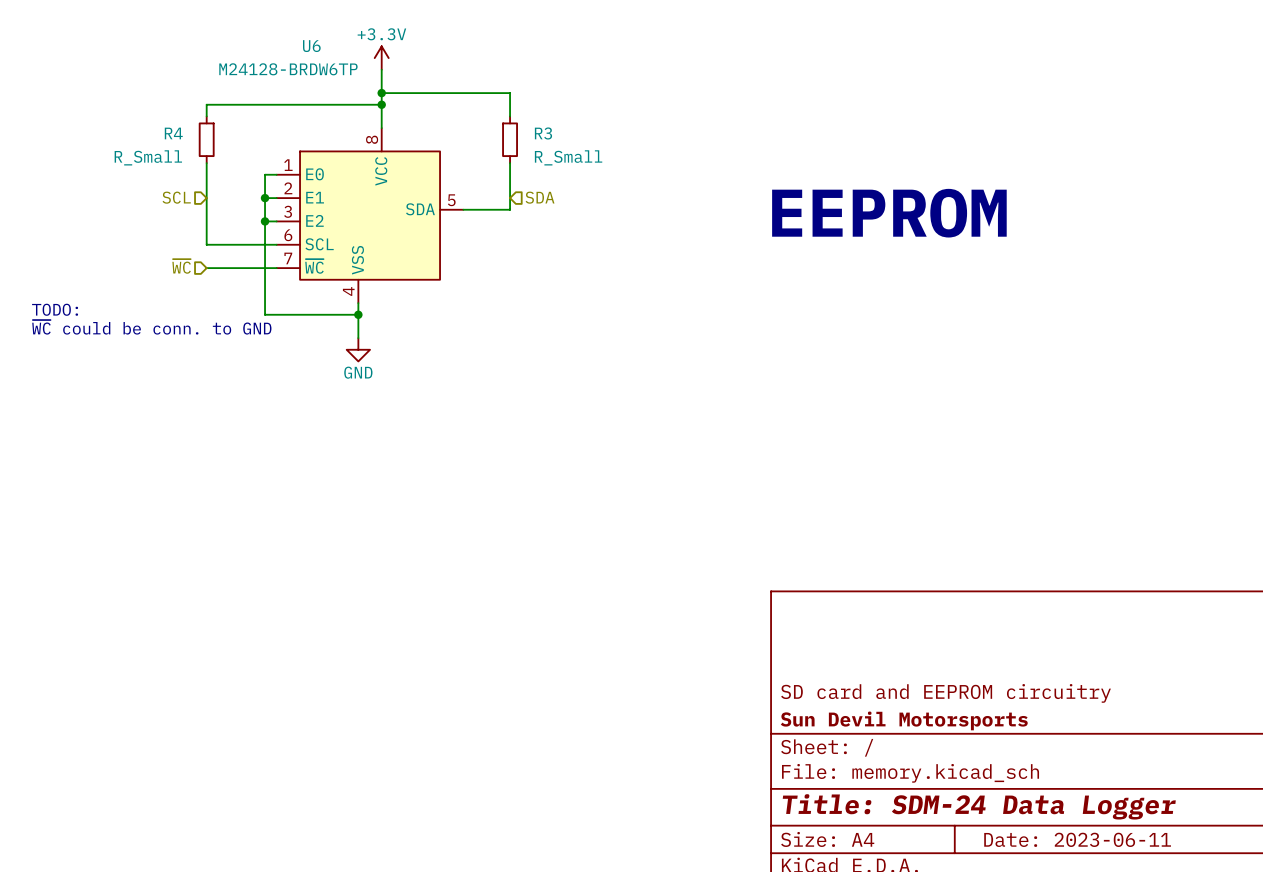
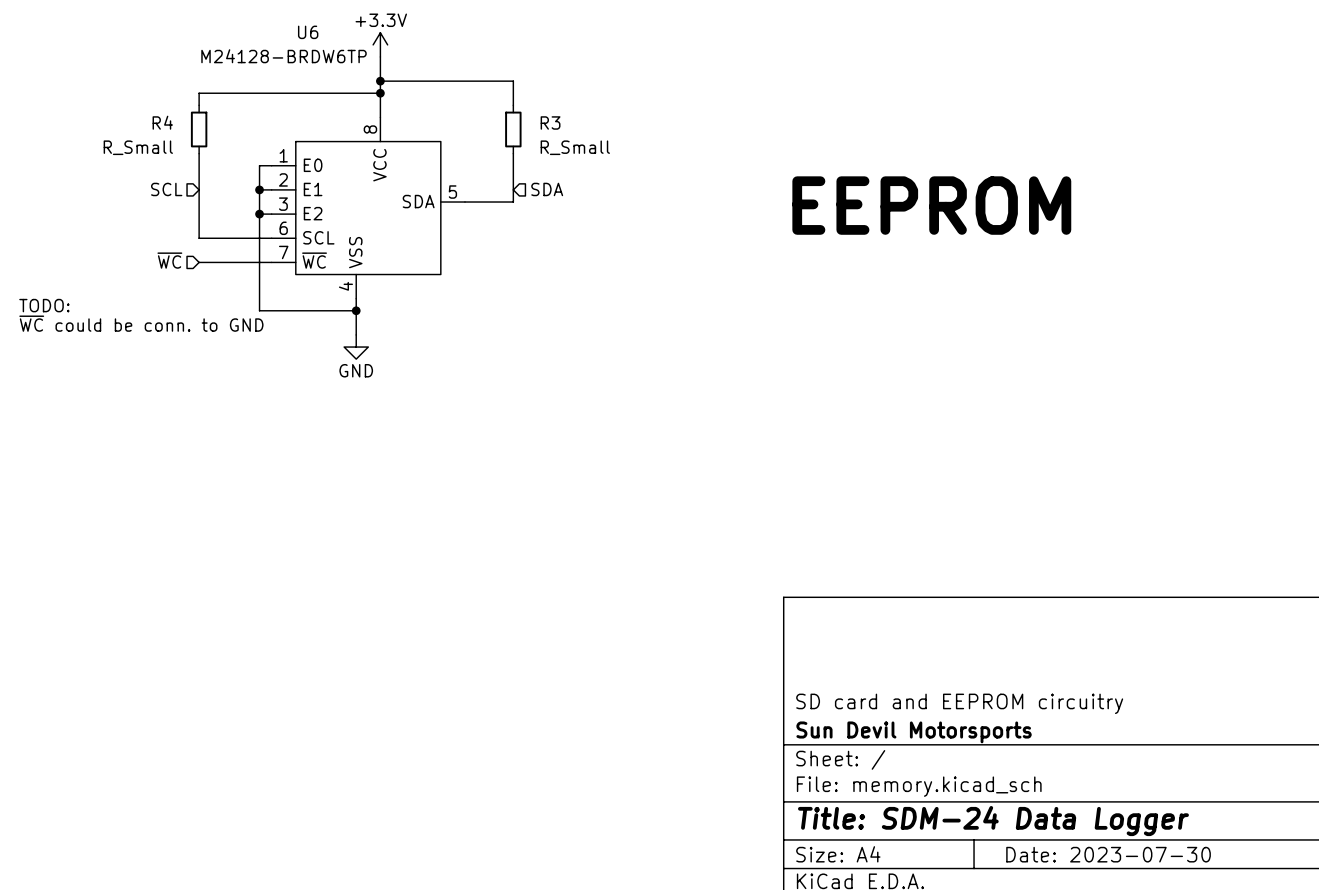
title block: Date: 2023-06-11 (1077, 839) -> Date: 2023-07-30 (1108, 854)

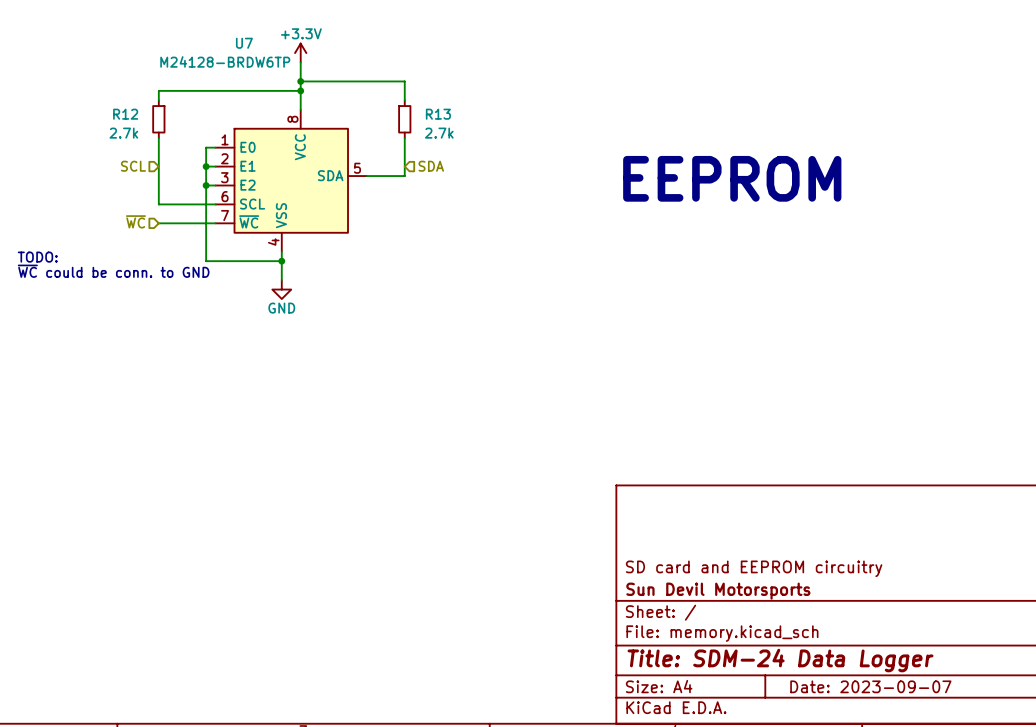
U6 name: U6 (308, 32) -> U7 (244, 43)
R4 name: R4 (162, 122) -> R12 (125, 114)
R3 name: R3 (550, 122) -> R13 (438, 114)
R4 value: R_Small (138, 147) -> 2.7k (123, 133)
R3 value: R_Small (575, 147) -> 2.7k (439, 133)
title block: Date: 2023-07-30 (1108, 854) -> Date: 2023-09-07 (870, 686)

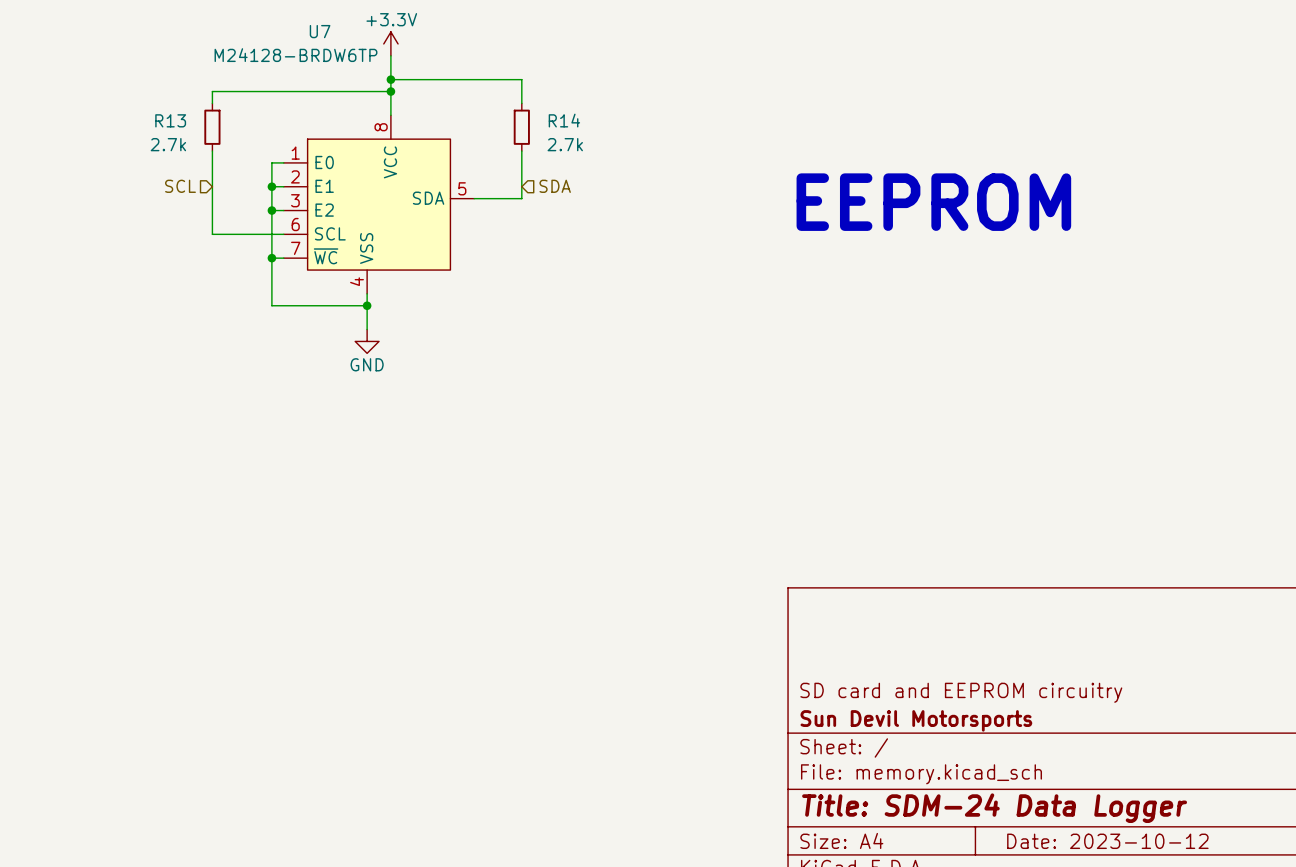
R12 name: R12 (125, 114) -> R13 (170, 120)
R13 name: R13 (438, 114) -> R14 (564, 120)
hierarchical label: ~{WC} (135, 221) -> none
wire: (158, 223) (206, 223) -> none
junction: none -> (271, 258)
text: TODO: (37, 257) -> none
text: ~{WC} could be conn. to GND (113, 271) -> none
title block: Date: 2023-09-07 (870, 686) -> Date: 2023-10-12 (1107, 841)

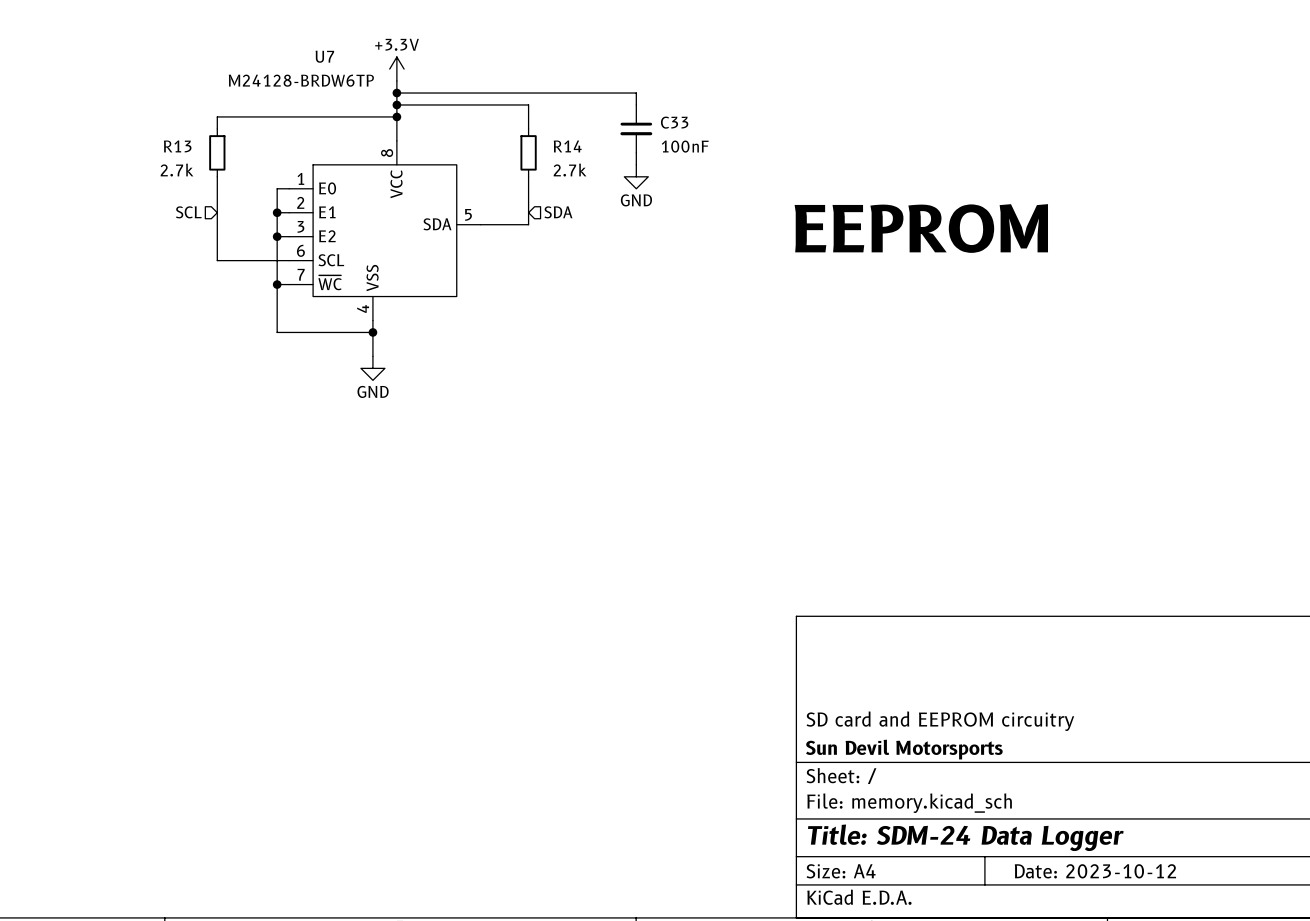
wire: none -> (396, 93) (636, 93) (636, 104)
junction: none -> (396, 93)
C33: none -> 100nF (636, 128)
wire: none -> (636, 152) (636, 164)
power symbol: none -> GND (636, 176)

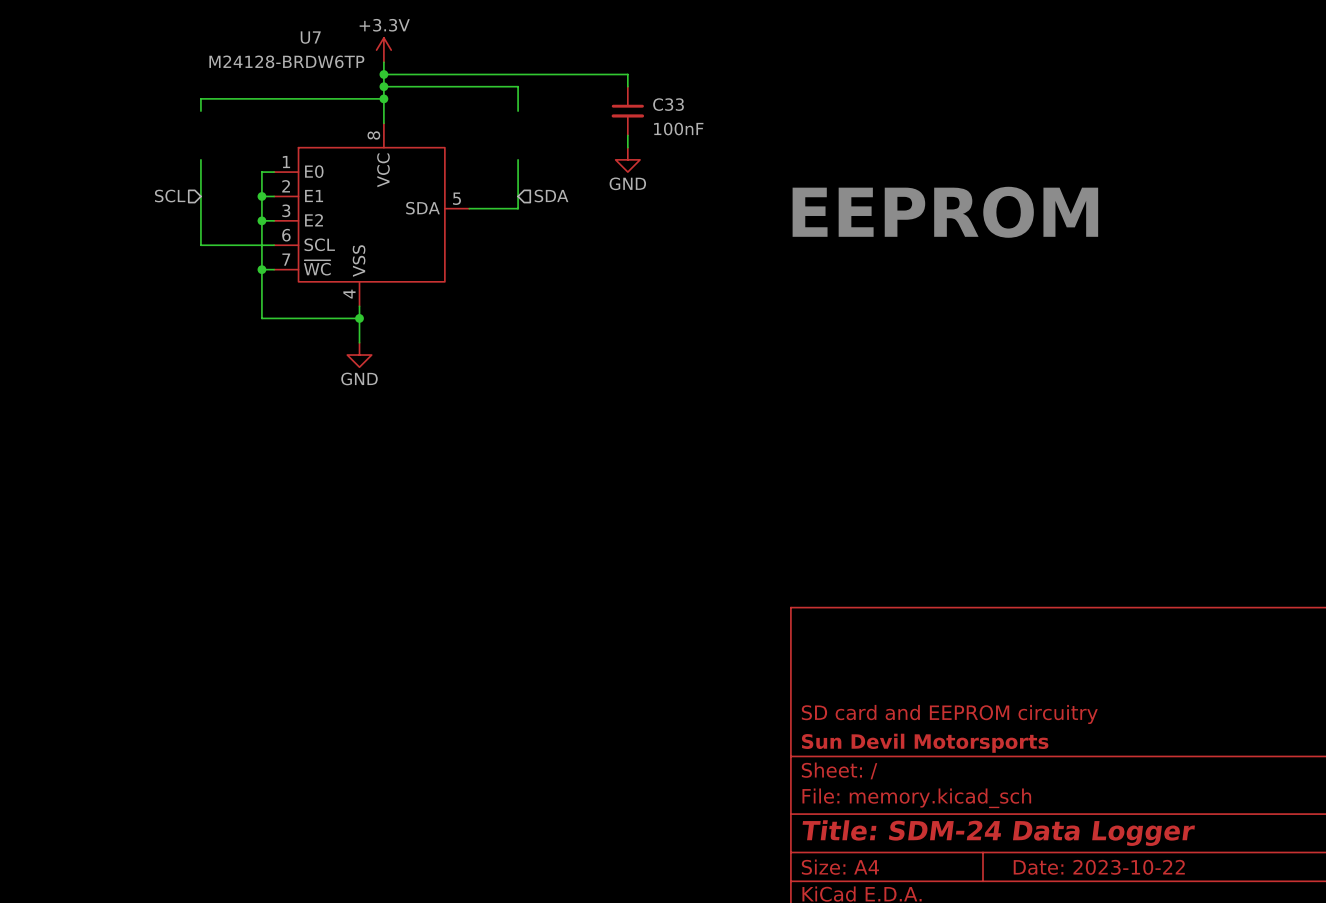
R13: 2.7k (217, 152) -> none
R14: 2.7k (528, 152) -> none
title block: Date: 2023-10-12 (1095, 871) -> Date: 2023-10-22 (1099, 867)

